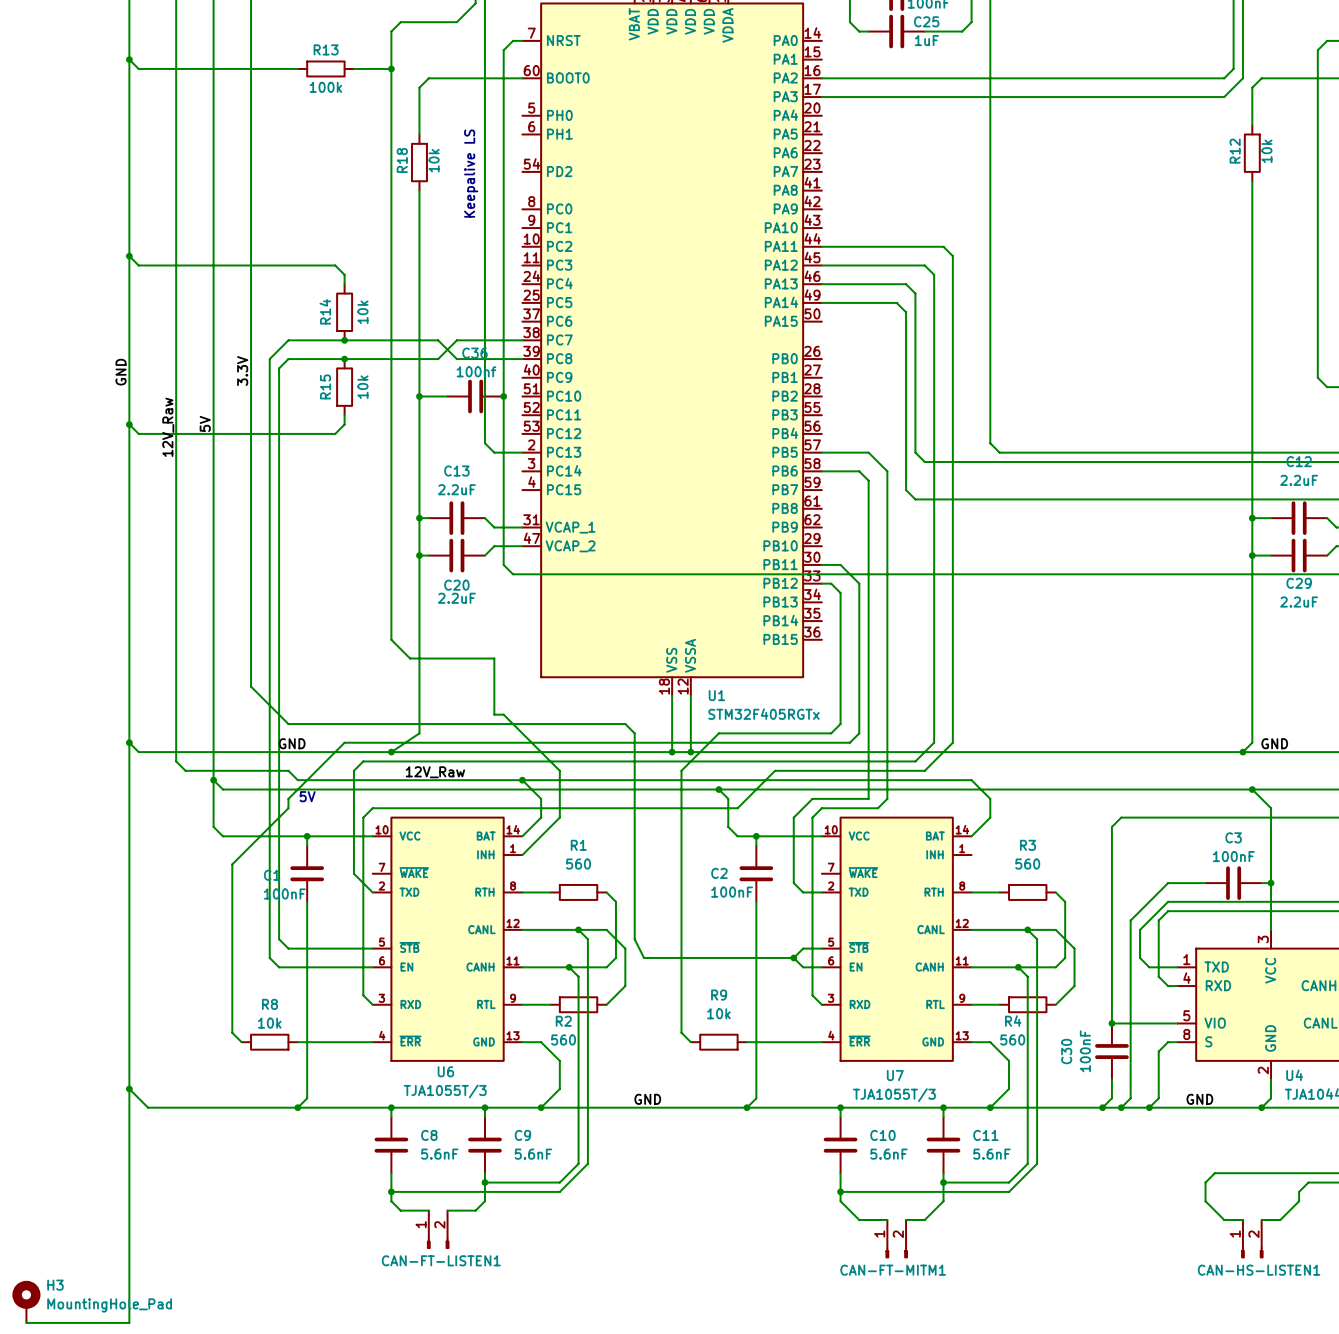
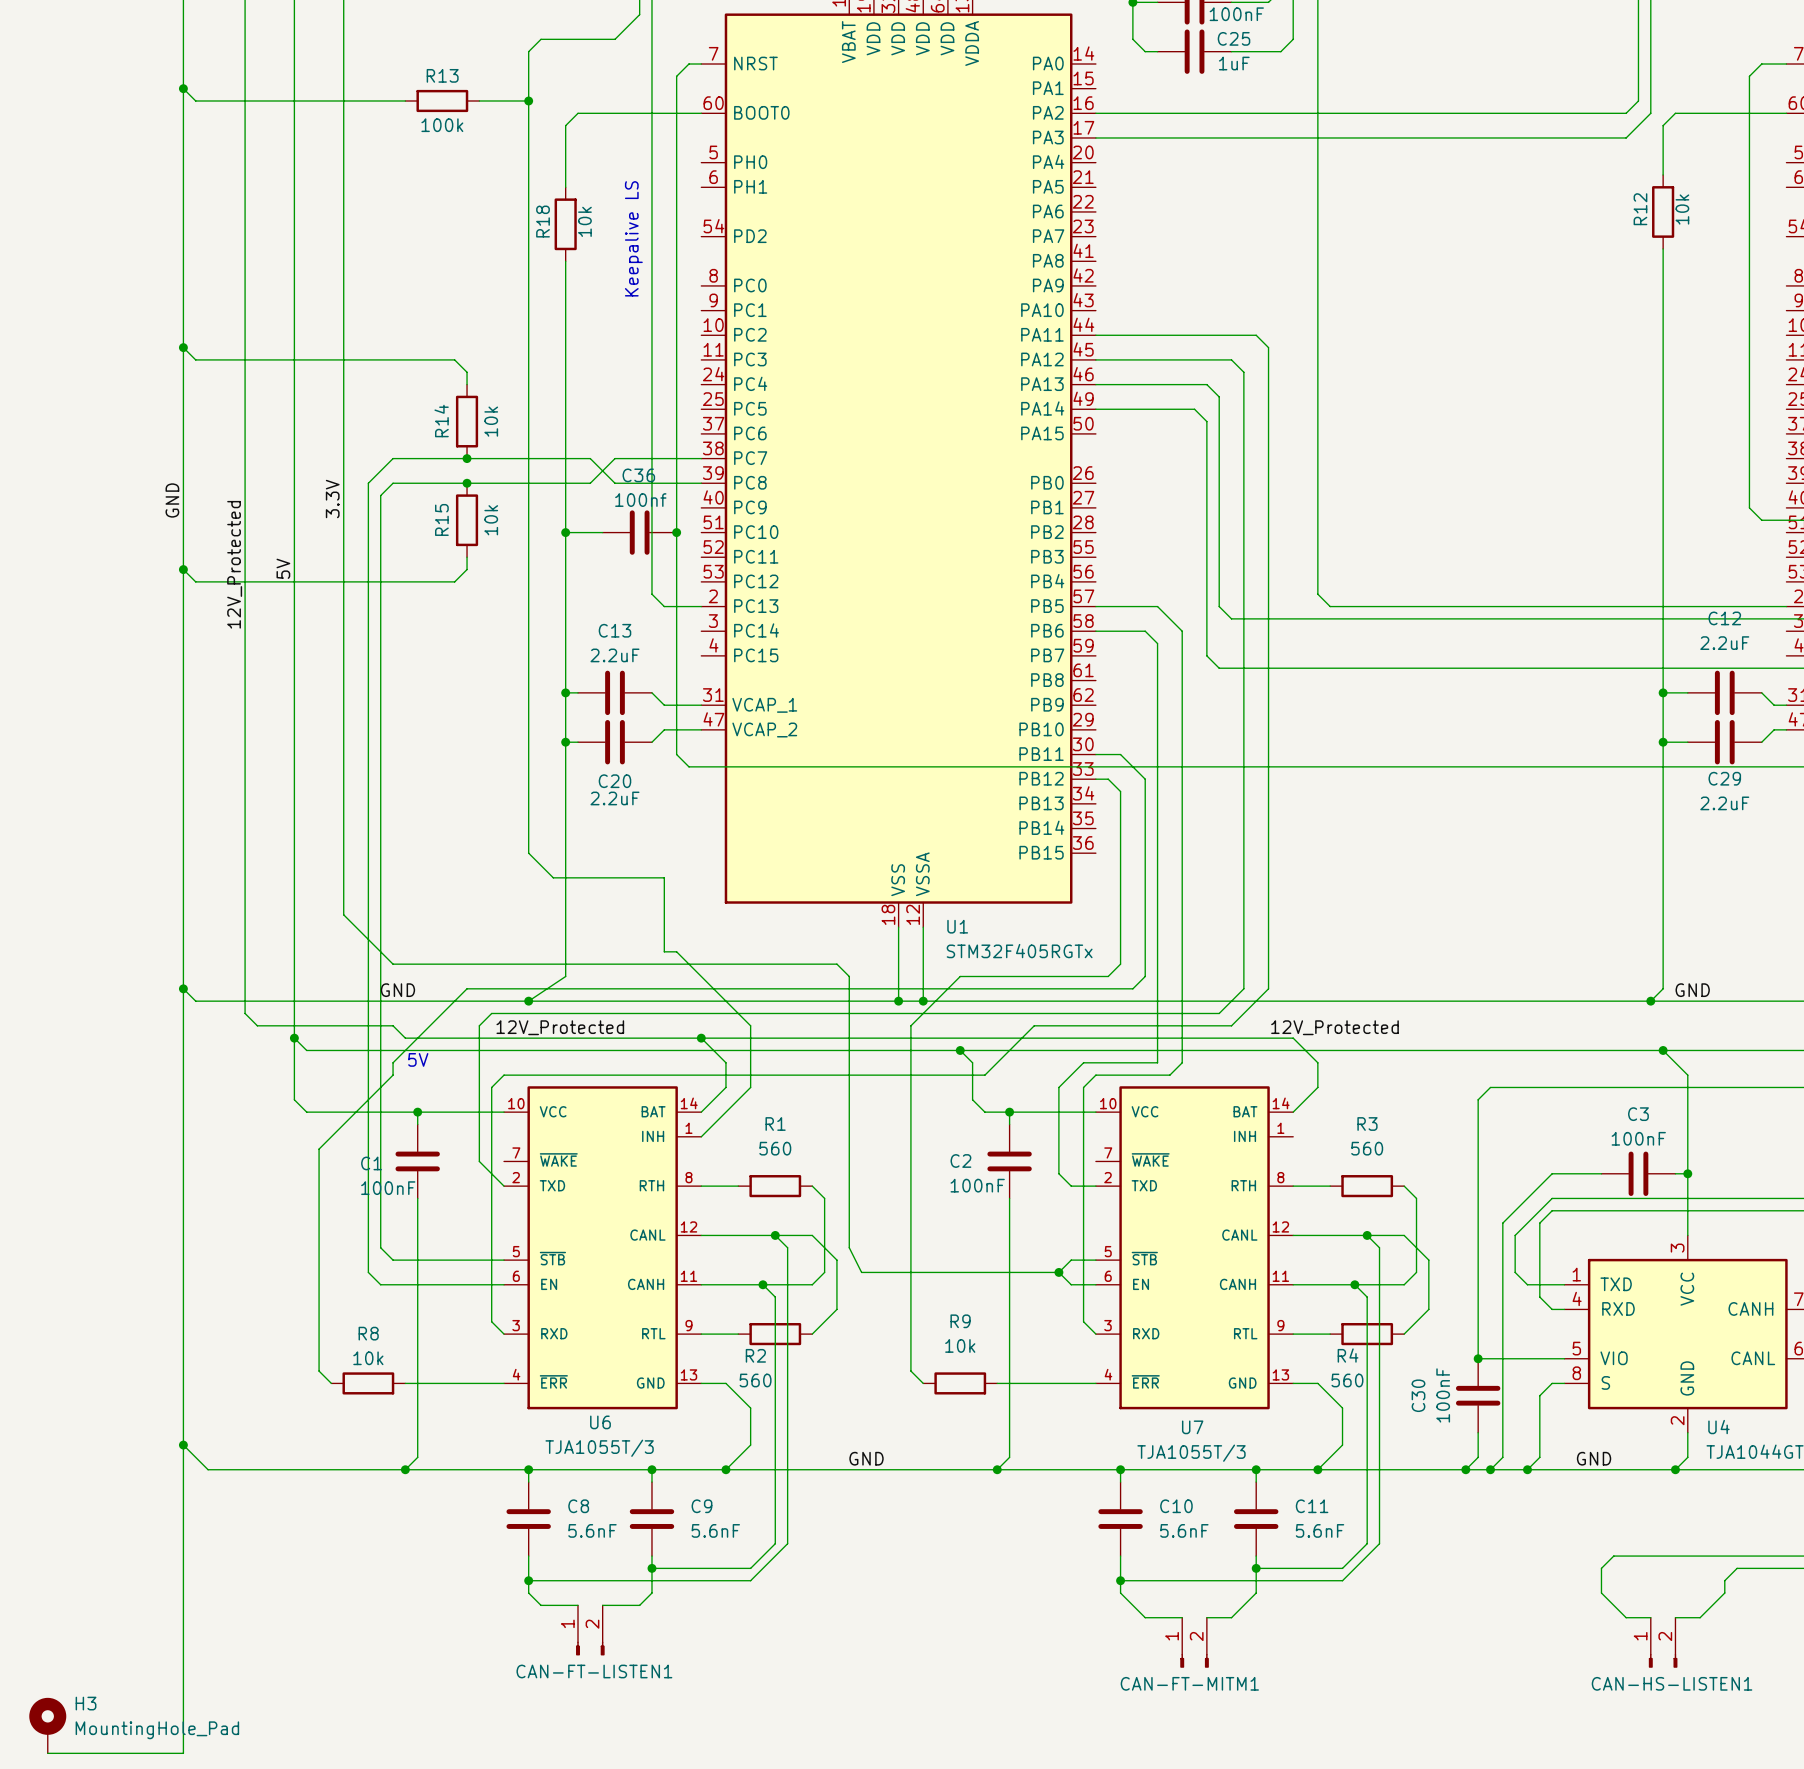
label: none -> 12V_Protected (234, 564)
label: 12V_Raw (168, 427) -> none
label: 12V_Raw (435, 772) -> 12V_Protected (560, 1027)
label: none -> 12V_Protected (1334, 1027)

